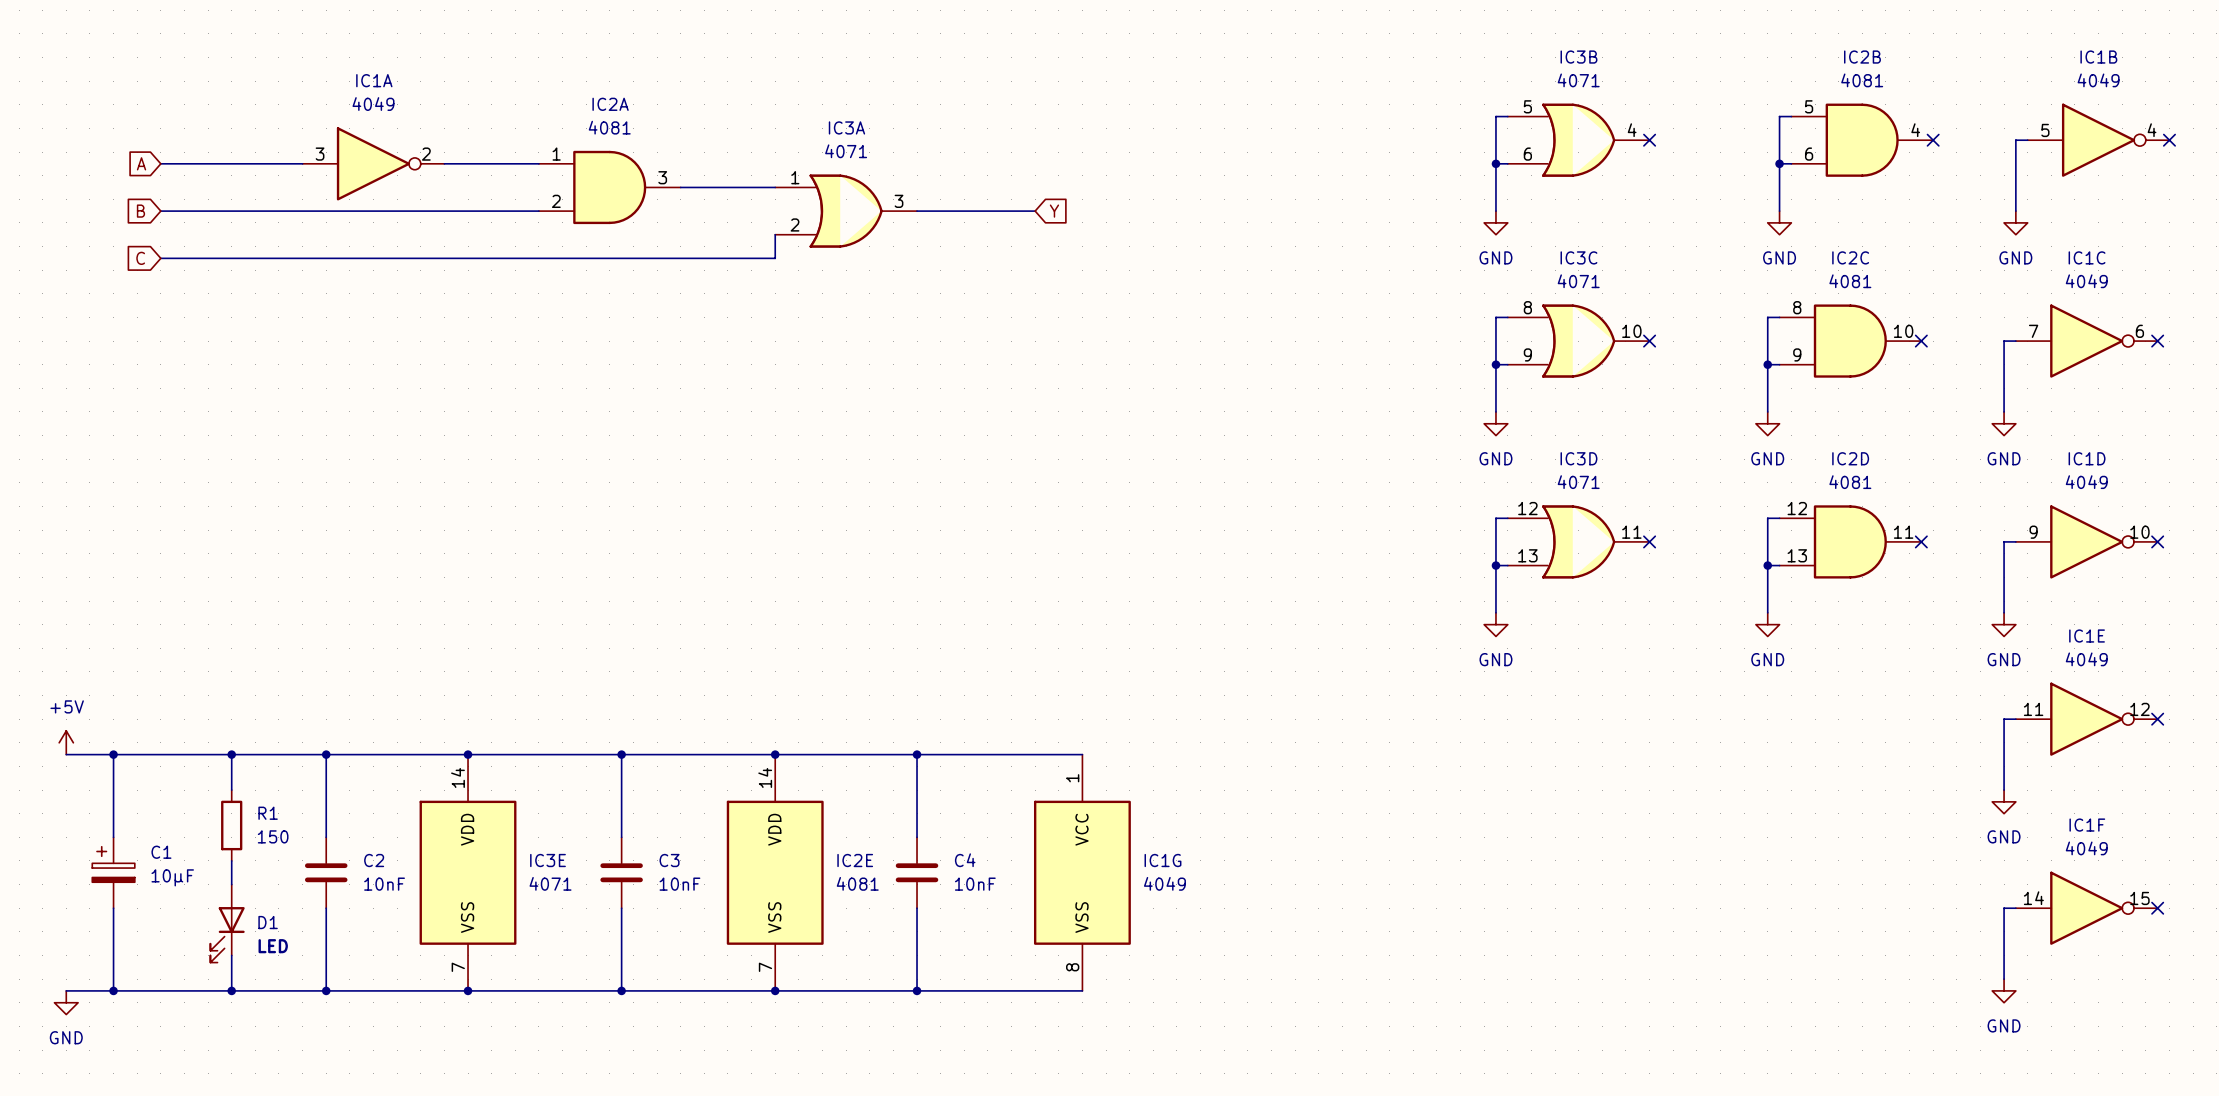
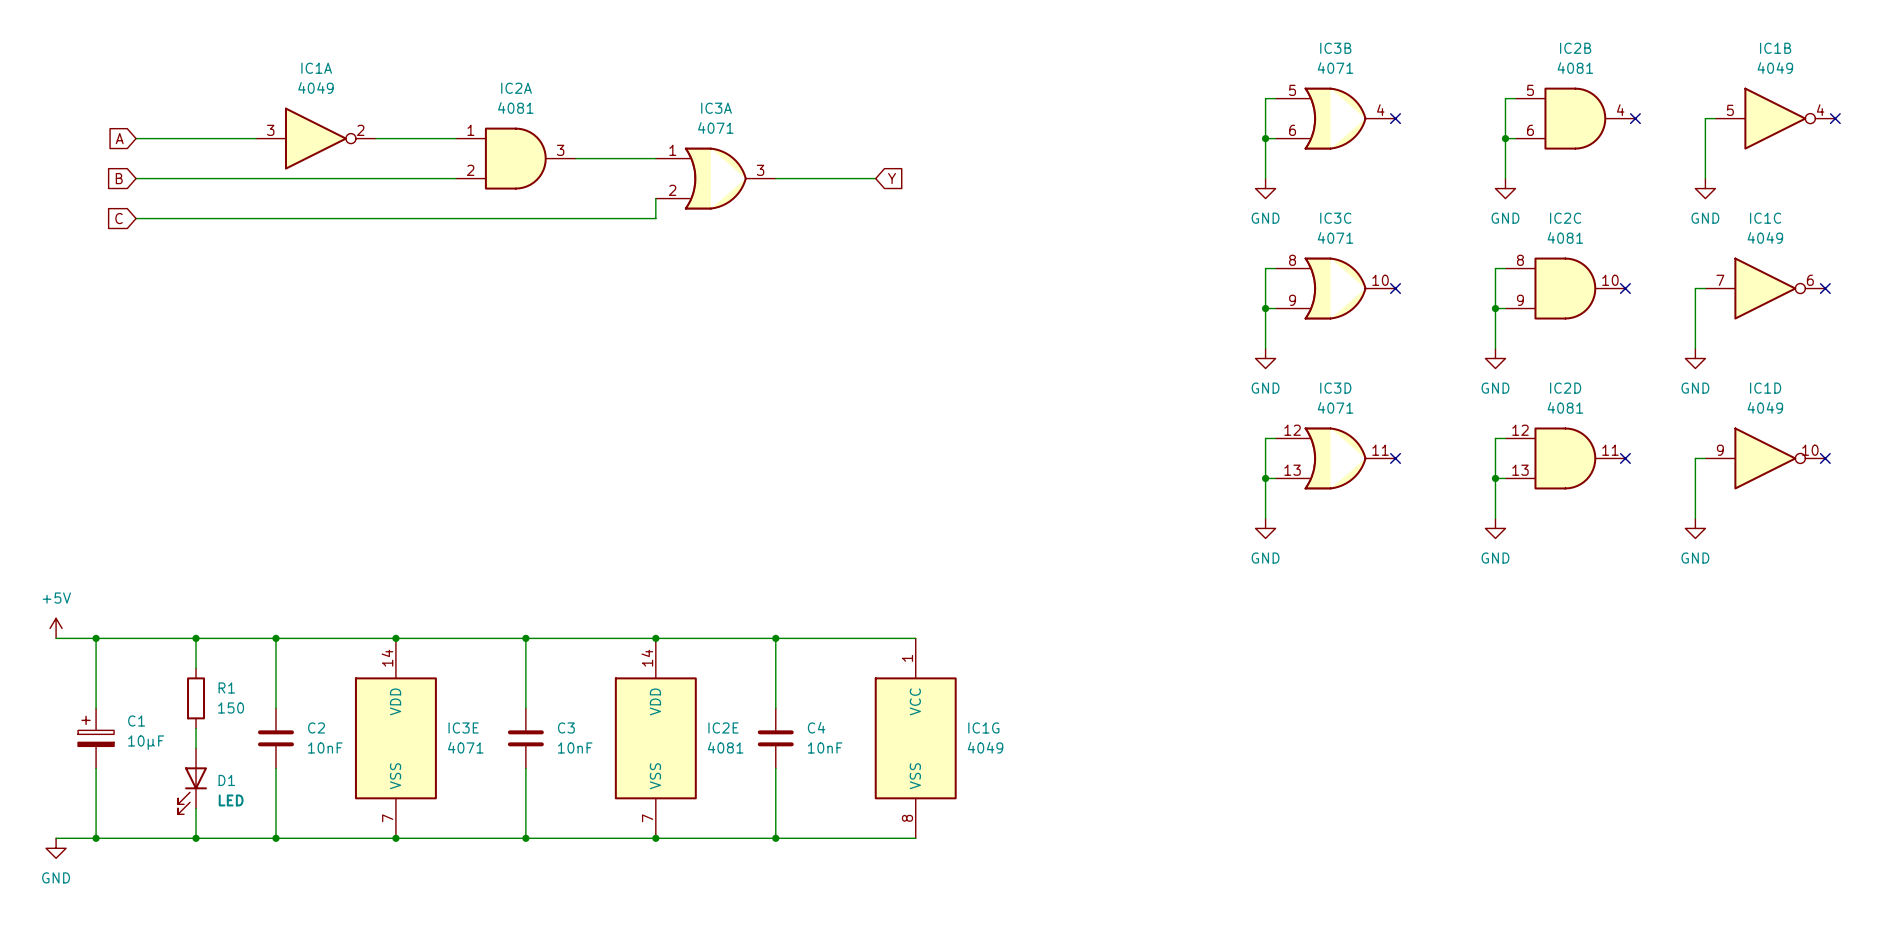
wire: (2015, 719) (2004, 719) (2004, 790) -> none
IC1E: 4049 (2086, 719) -> none
no-connect mark: (2157, 719) -> none
power symbol: GND (2004, 801) -> none
wire: (2015, 908) (2004, 908) (2004, 979) -> none
IC1F: 4049 (2086, 908) -> none
no-connect mark: (2157, 908) -> none
power symbol: GND (2004, 990) -> none

